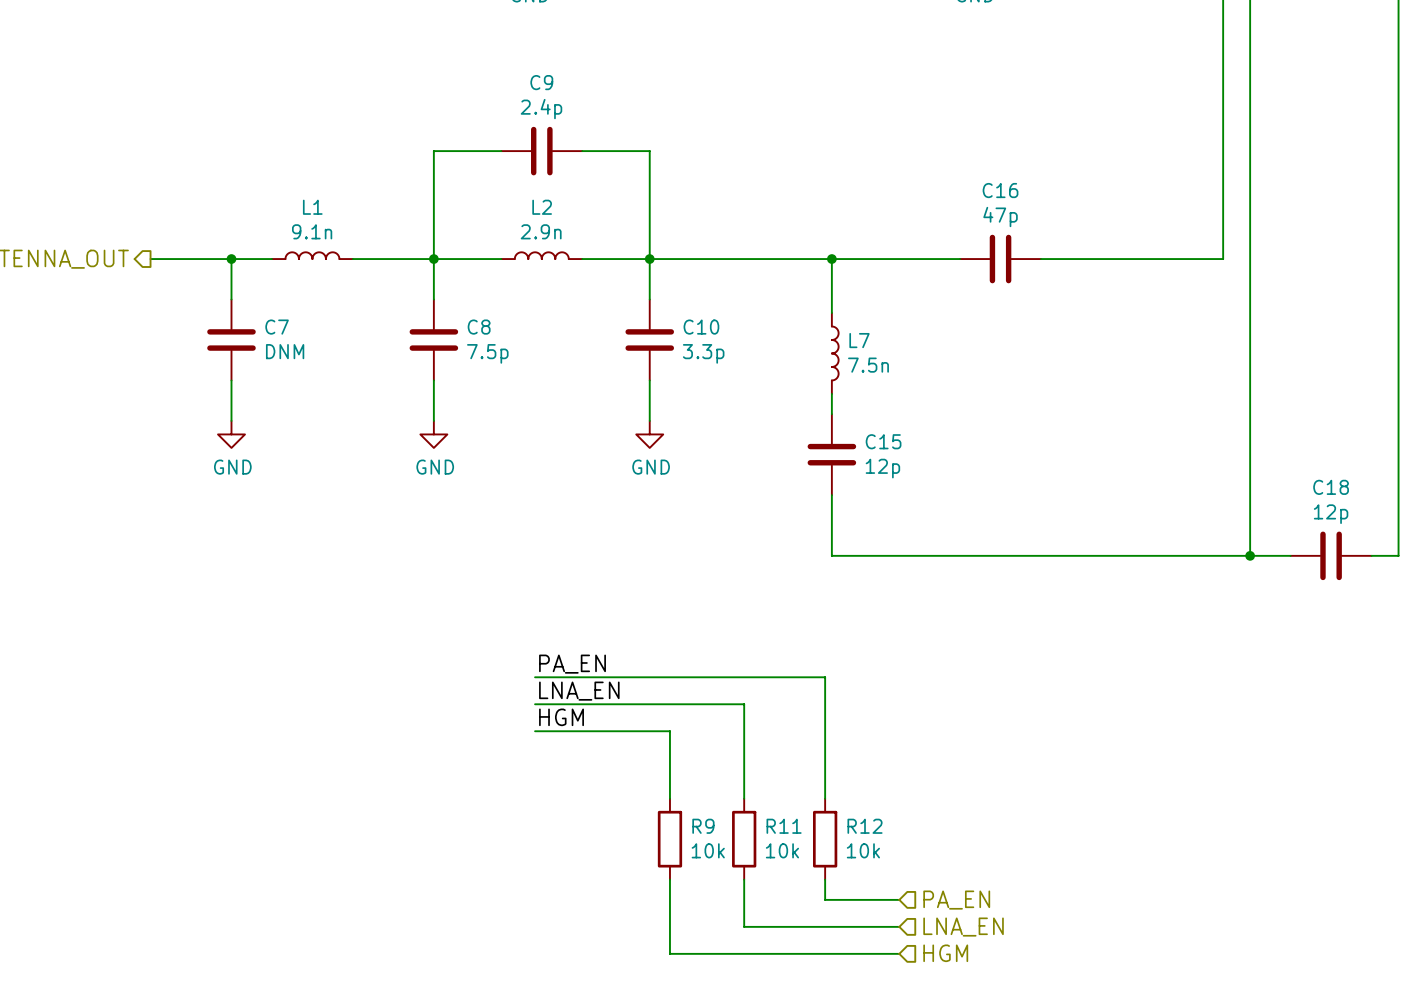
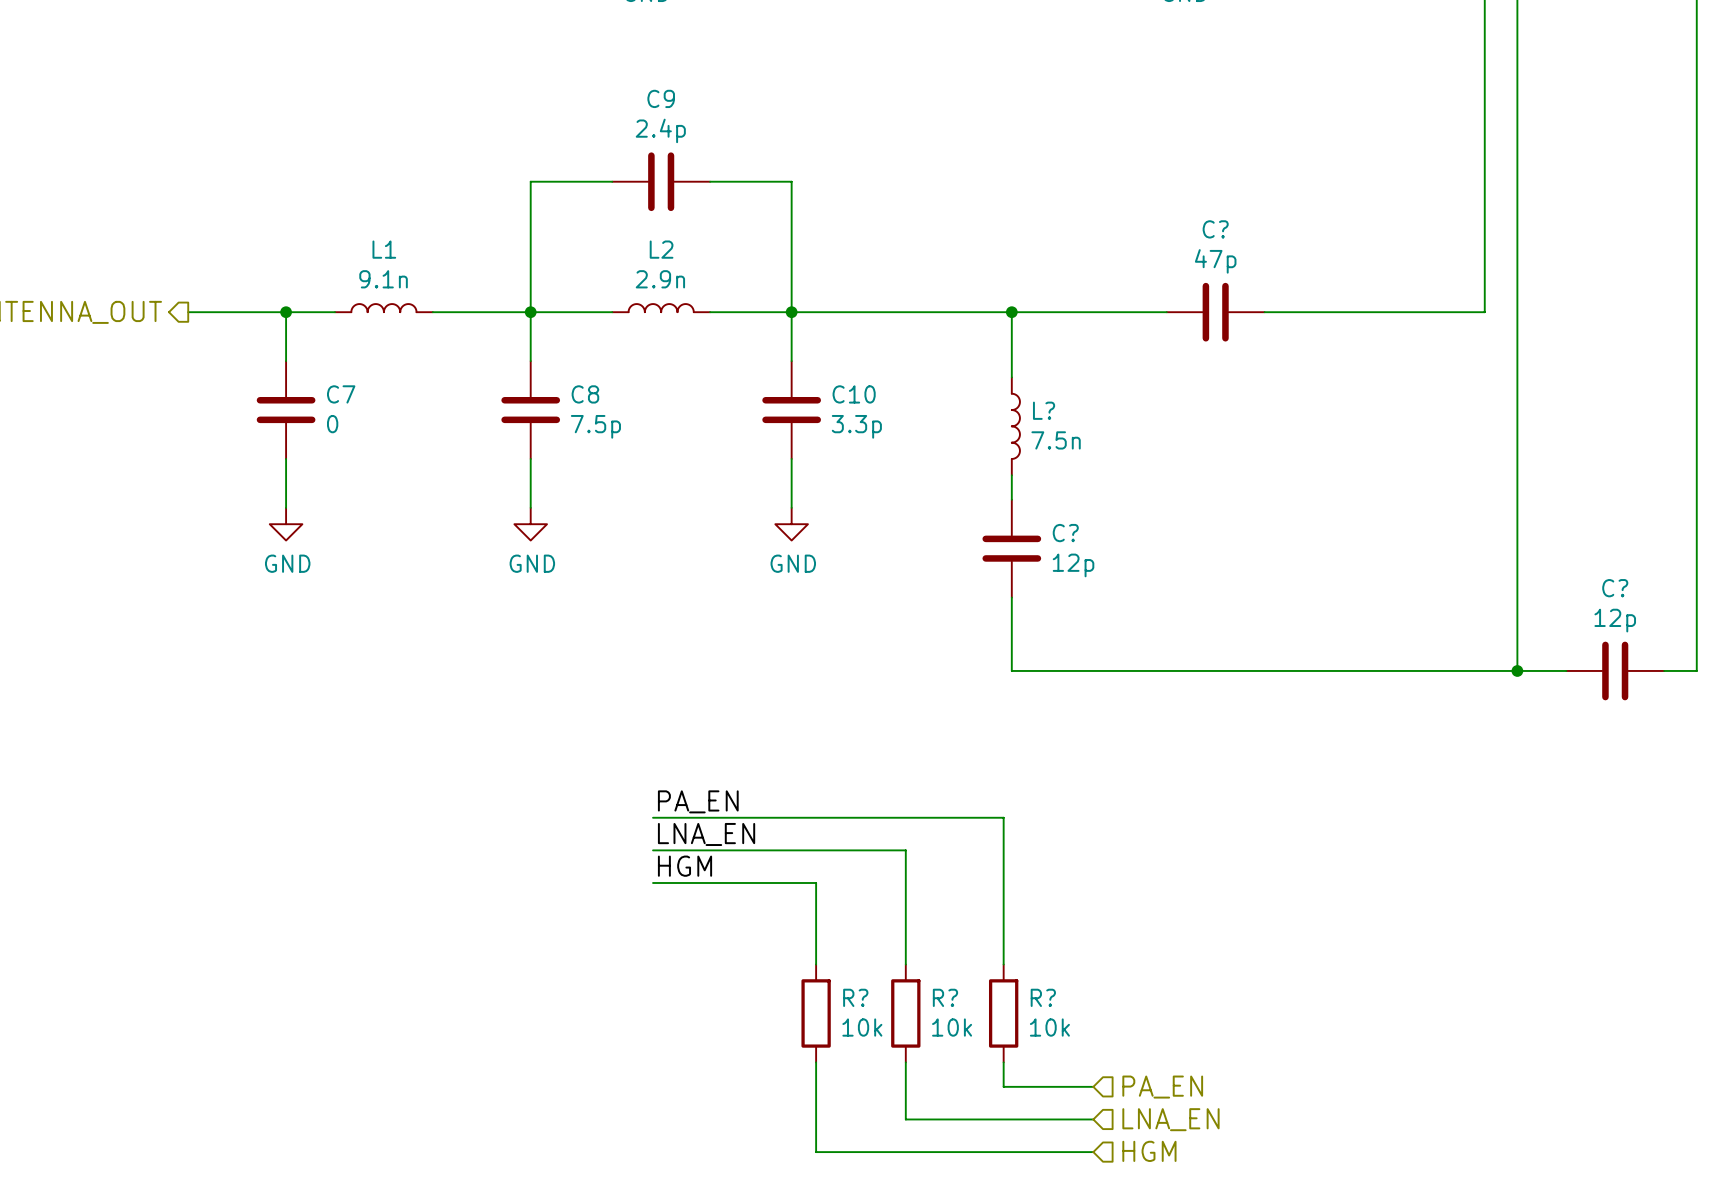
C16 name: C16 (1000, 190) -> C? (1215, 229)
L7 name: L7 (859, 340) -> L? (1044, 410)
C7 value: DNM (285, 351) -> 0 (332, 424)
C15 name: C15 (883, 441) -> C? (1065, 533)
C18 name: C18 (1331, 487) -> C? (1615, 588)
R9 name: R9 (703, 826) -> R? (855, 997)
R11 name: R11 (784, 826) -> R? (945, 997)
R12 name: R12 (865, 826) -> R? (1043, 997)

